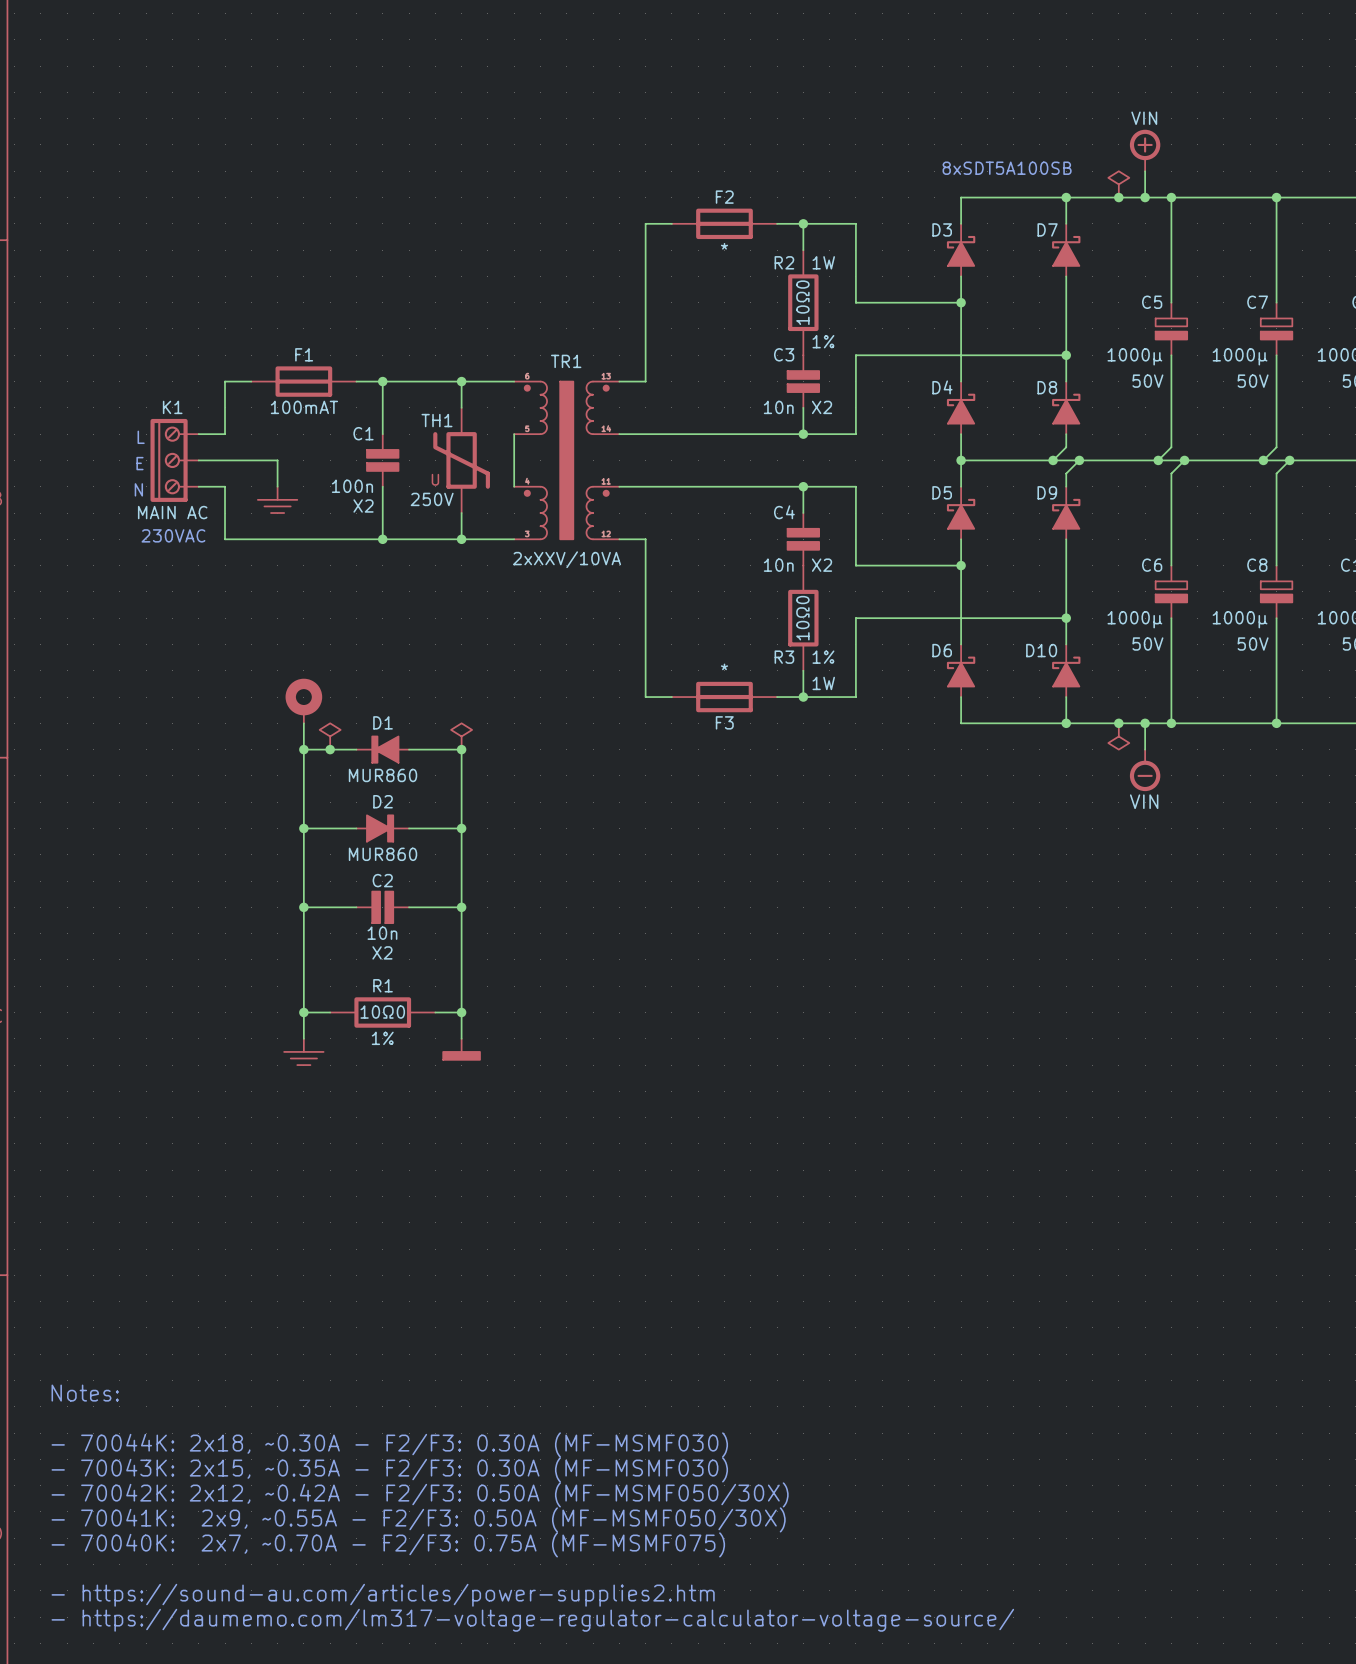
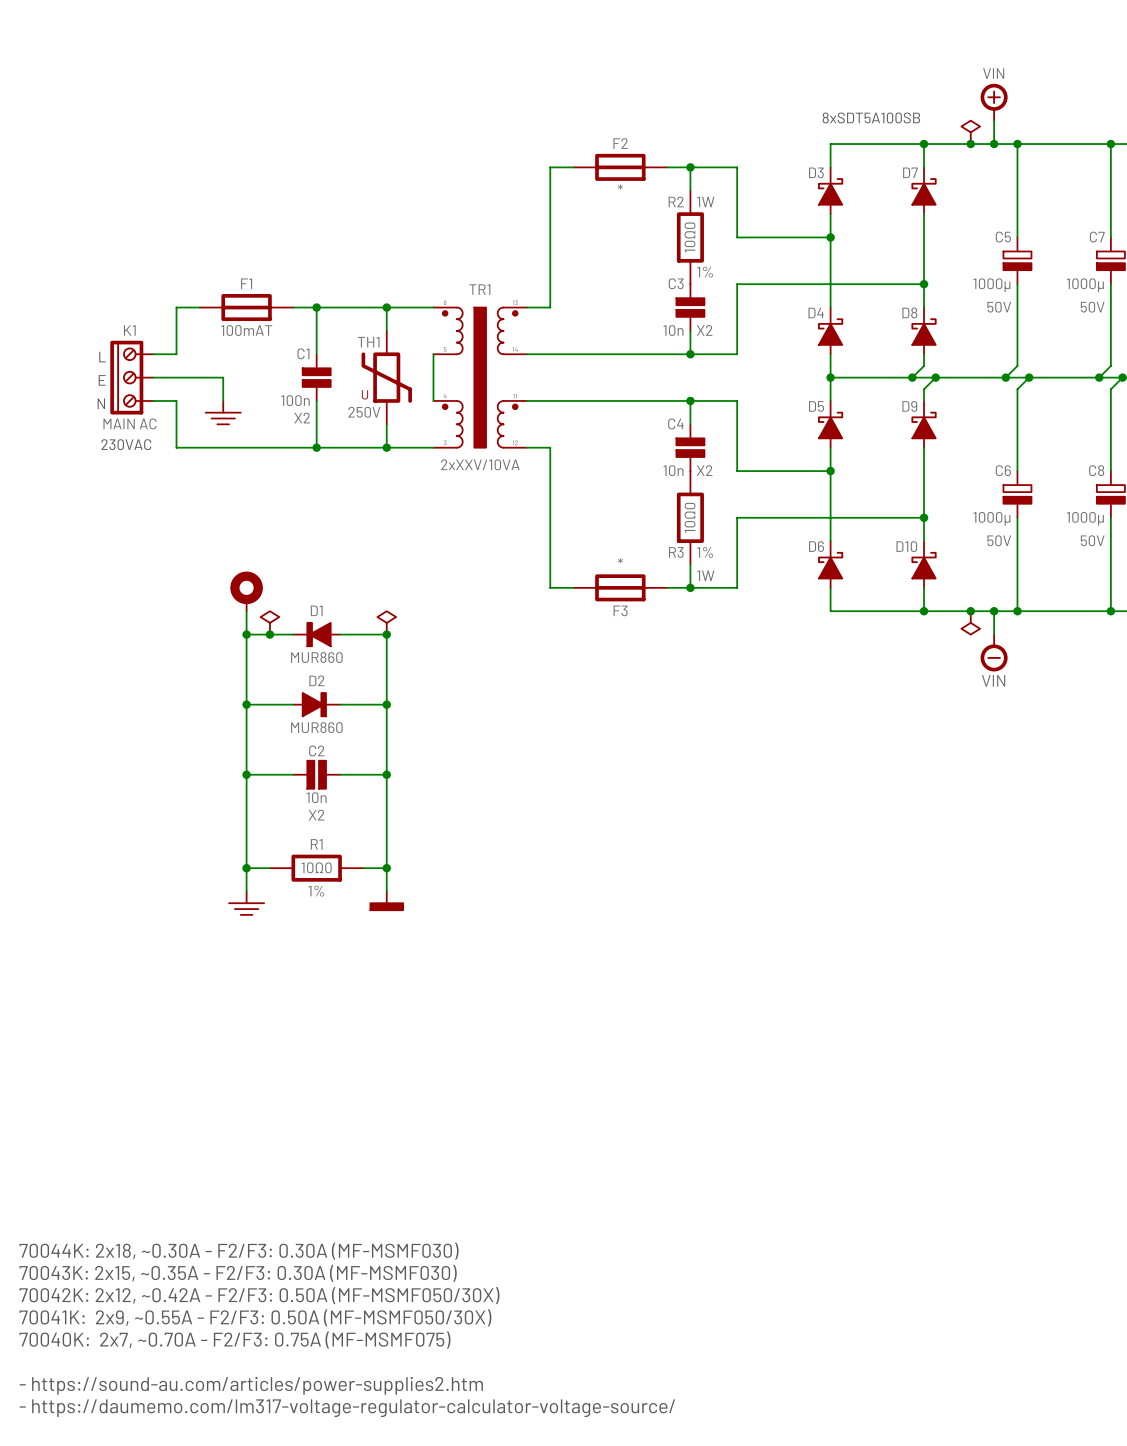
text: Notes: (85, 1393) -> none
text: - 70044K: 2x18, ~0.30A - F2/F3: 0.30A (MF-MSMF030) (389, 1444) -> 70044K: 2x18, ~0.30A - F2/F3: 0.30A (MF-MSMF030) (239, 1251)
text: - 70043K: 2x15, ~0.35A - F2/F3: 0.30A (MF-MSMF030) (389, 1469) -> 70043K: 2x15, ~0.35A - F2/F3: 0.30A (MF-MSMF030) (238, 1273)
text: - 70042K: 2x12, ~0.42A - F2/F3: 0.50A (MF-MSMF050/30X) (420, 1494) -> 70042K: 2x12, ~0.42A - F2/F3: 0.50A (MF-MSMF050/30X) (259, 1295)
text: - 70041K: 2x9, ~0.55A - F2/F3: 0.50A (MF-MSMF050/30X) (418, 1519) -> 70041K: 2x9, ~0.55A - F2/F3: 0.50A (MF-MSMF050/30X) (255, 1317)
text: - 70040K: 2x7, ~0.70A - F2/F3: 0.75A (MF-MSMF075) (388, 1544) -> 70040K: 2x7, ~0.70A - F2/F3: 0.75A (MF-MSMF075) (235, 1340)

